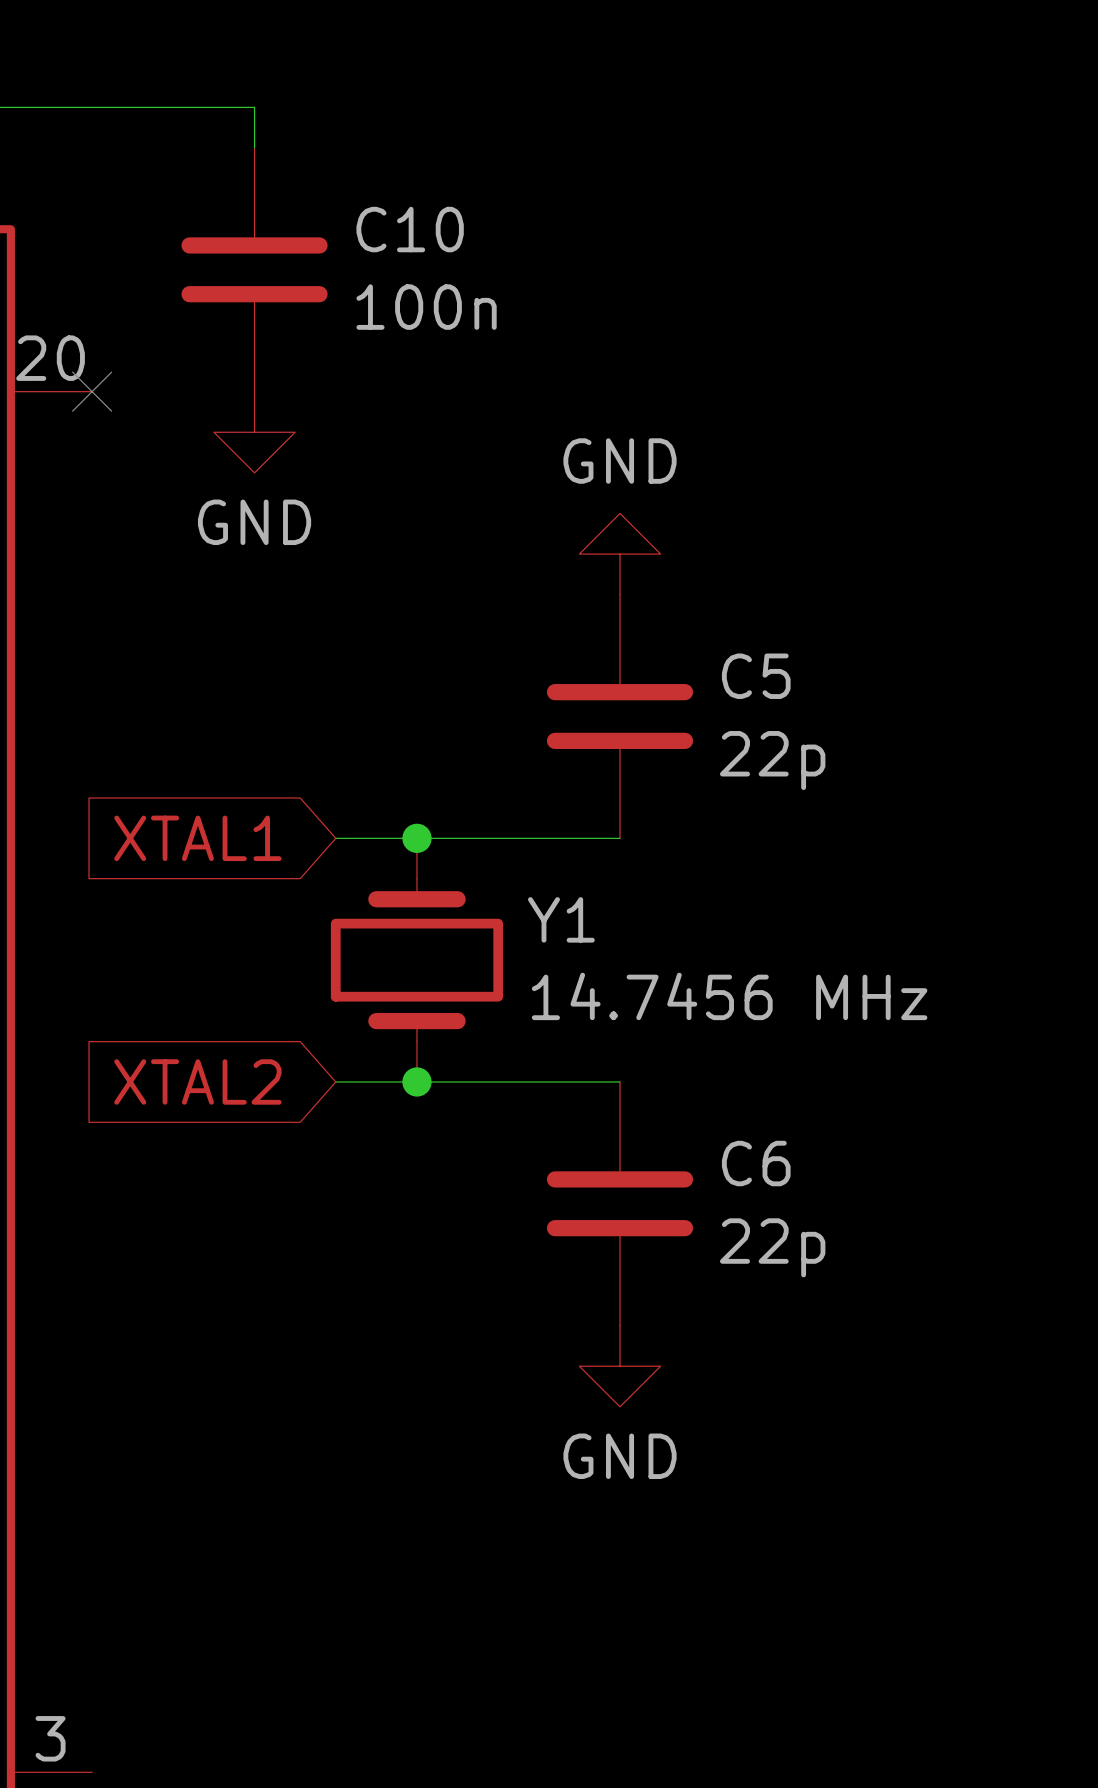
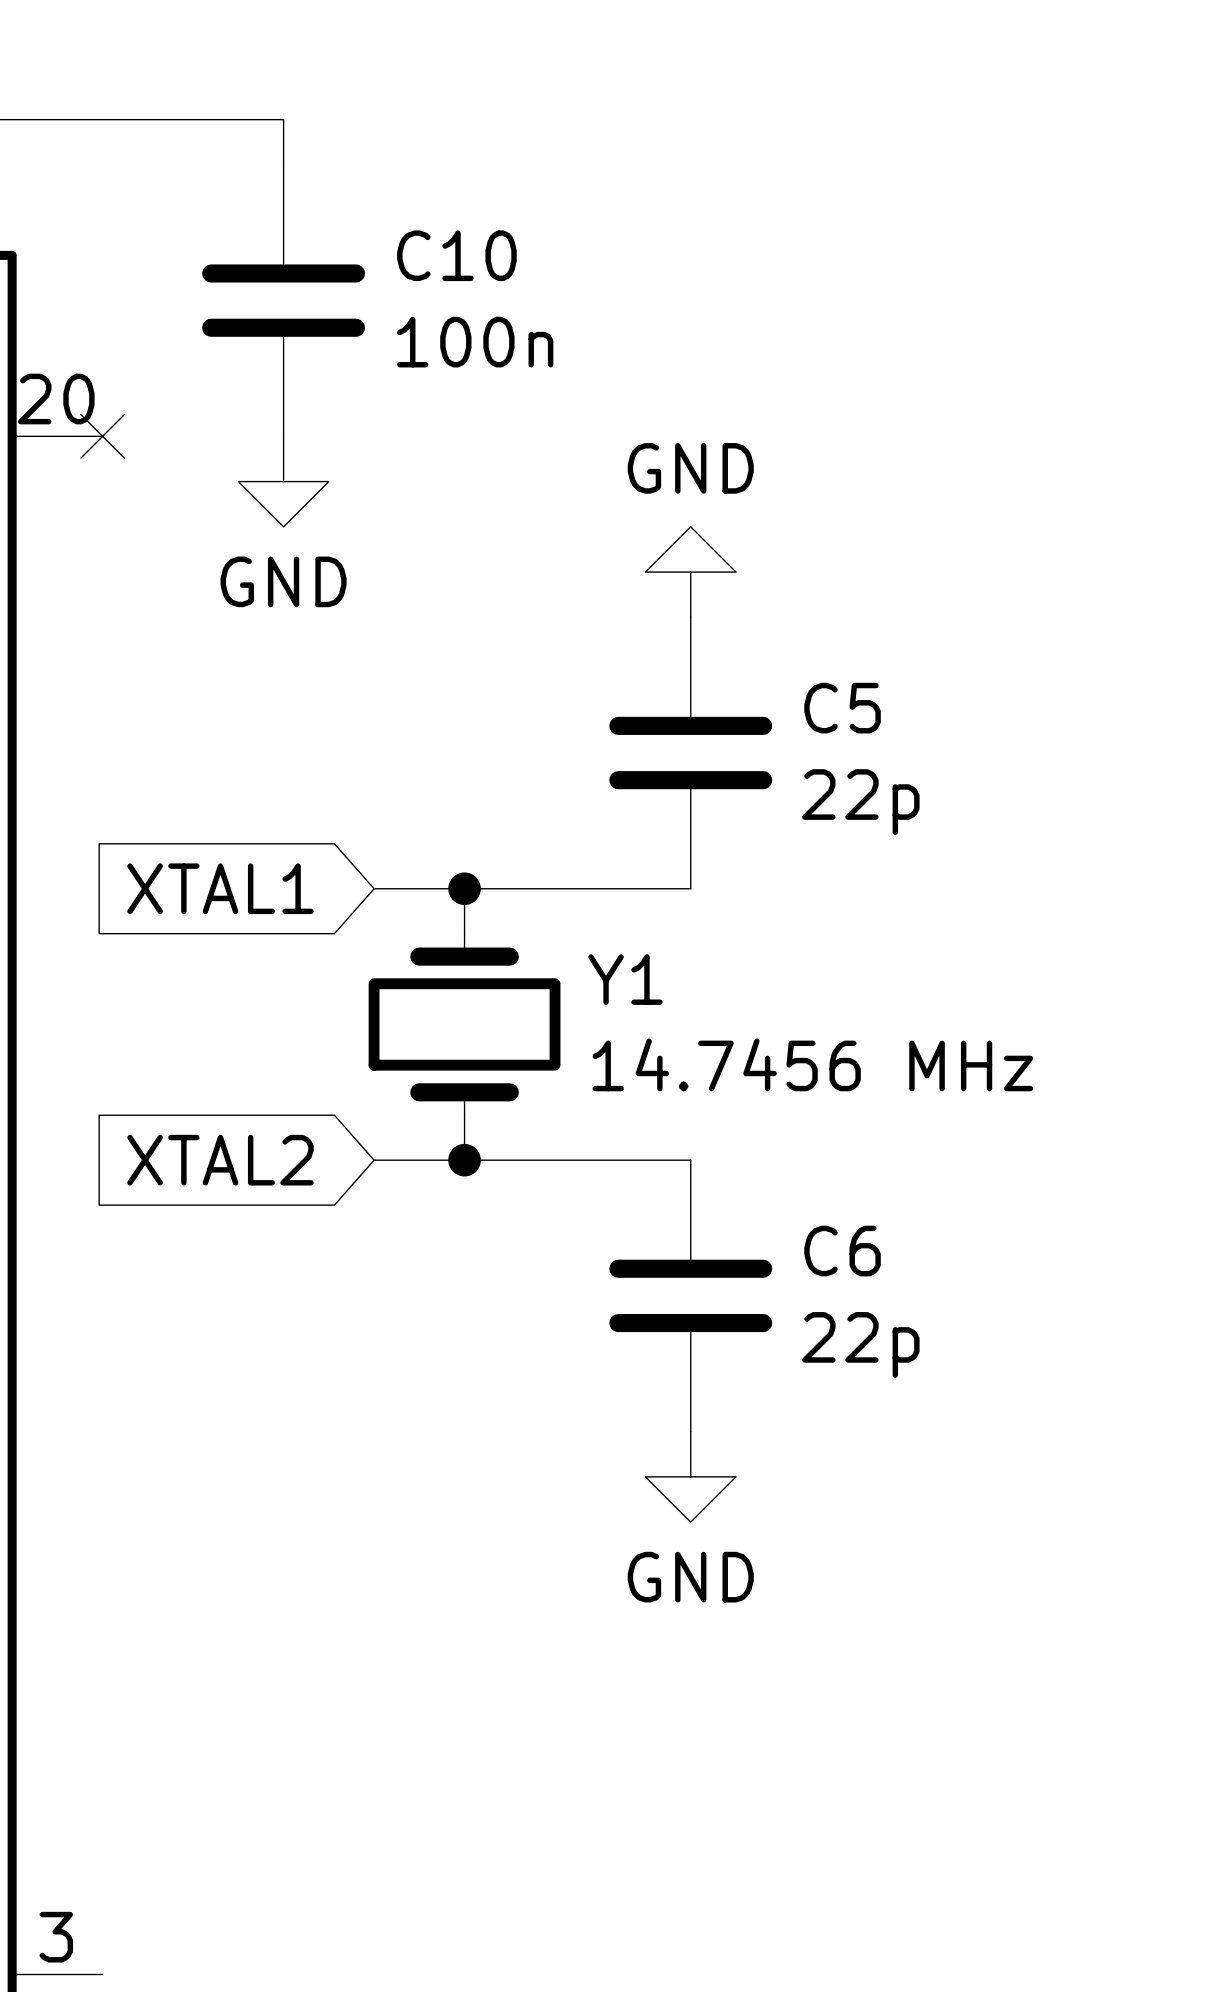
power symbol position: GND (620, 554) -> GND (690, 572)
C5 position: (620, 716) -> (690, 753)
global label position: XTAL1 (197, 838) -> XTAL1 (220, 888)
wire: (335, 838) (620, 838) -> (374, 888) (690, 888)
junction position: (416, 838) -> (464, 888)
Y1 position: (416, 960) -> (464, 1024)
global label position: XTAL2 (197, 1081) -> XTAL2 (220, 1160)
wire: (335, 1081) (620, 1081) -> (374, 1160) (690, 1160)
junction position: (416, 1081) -> (464, 1160)
C6 position: (620, 1203) -> (690, 1295)
power symbol position: GND (620, 1366) -> GND (690, 1476)

